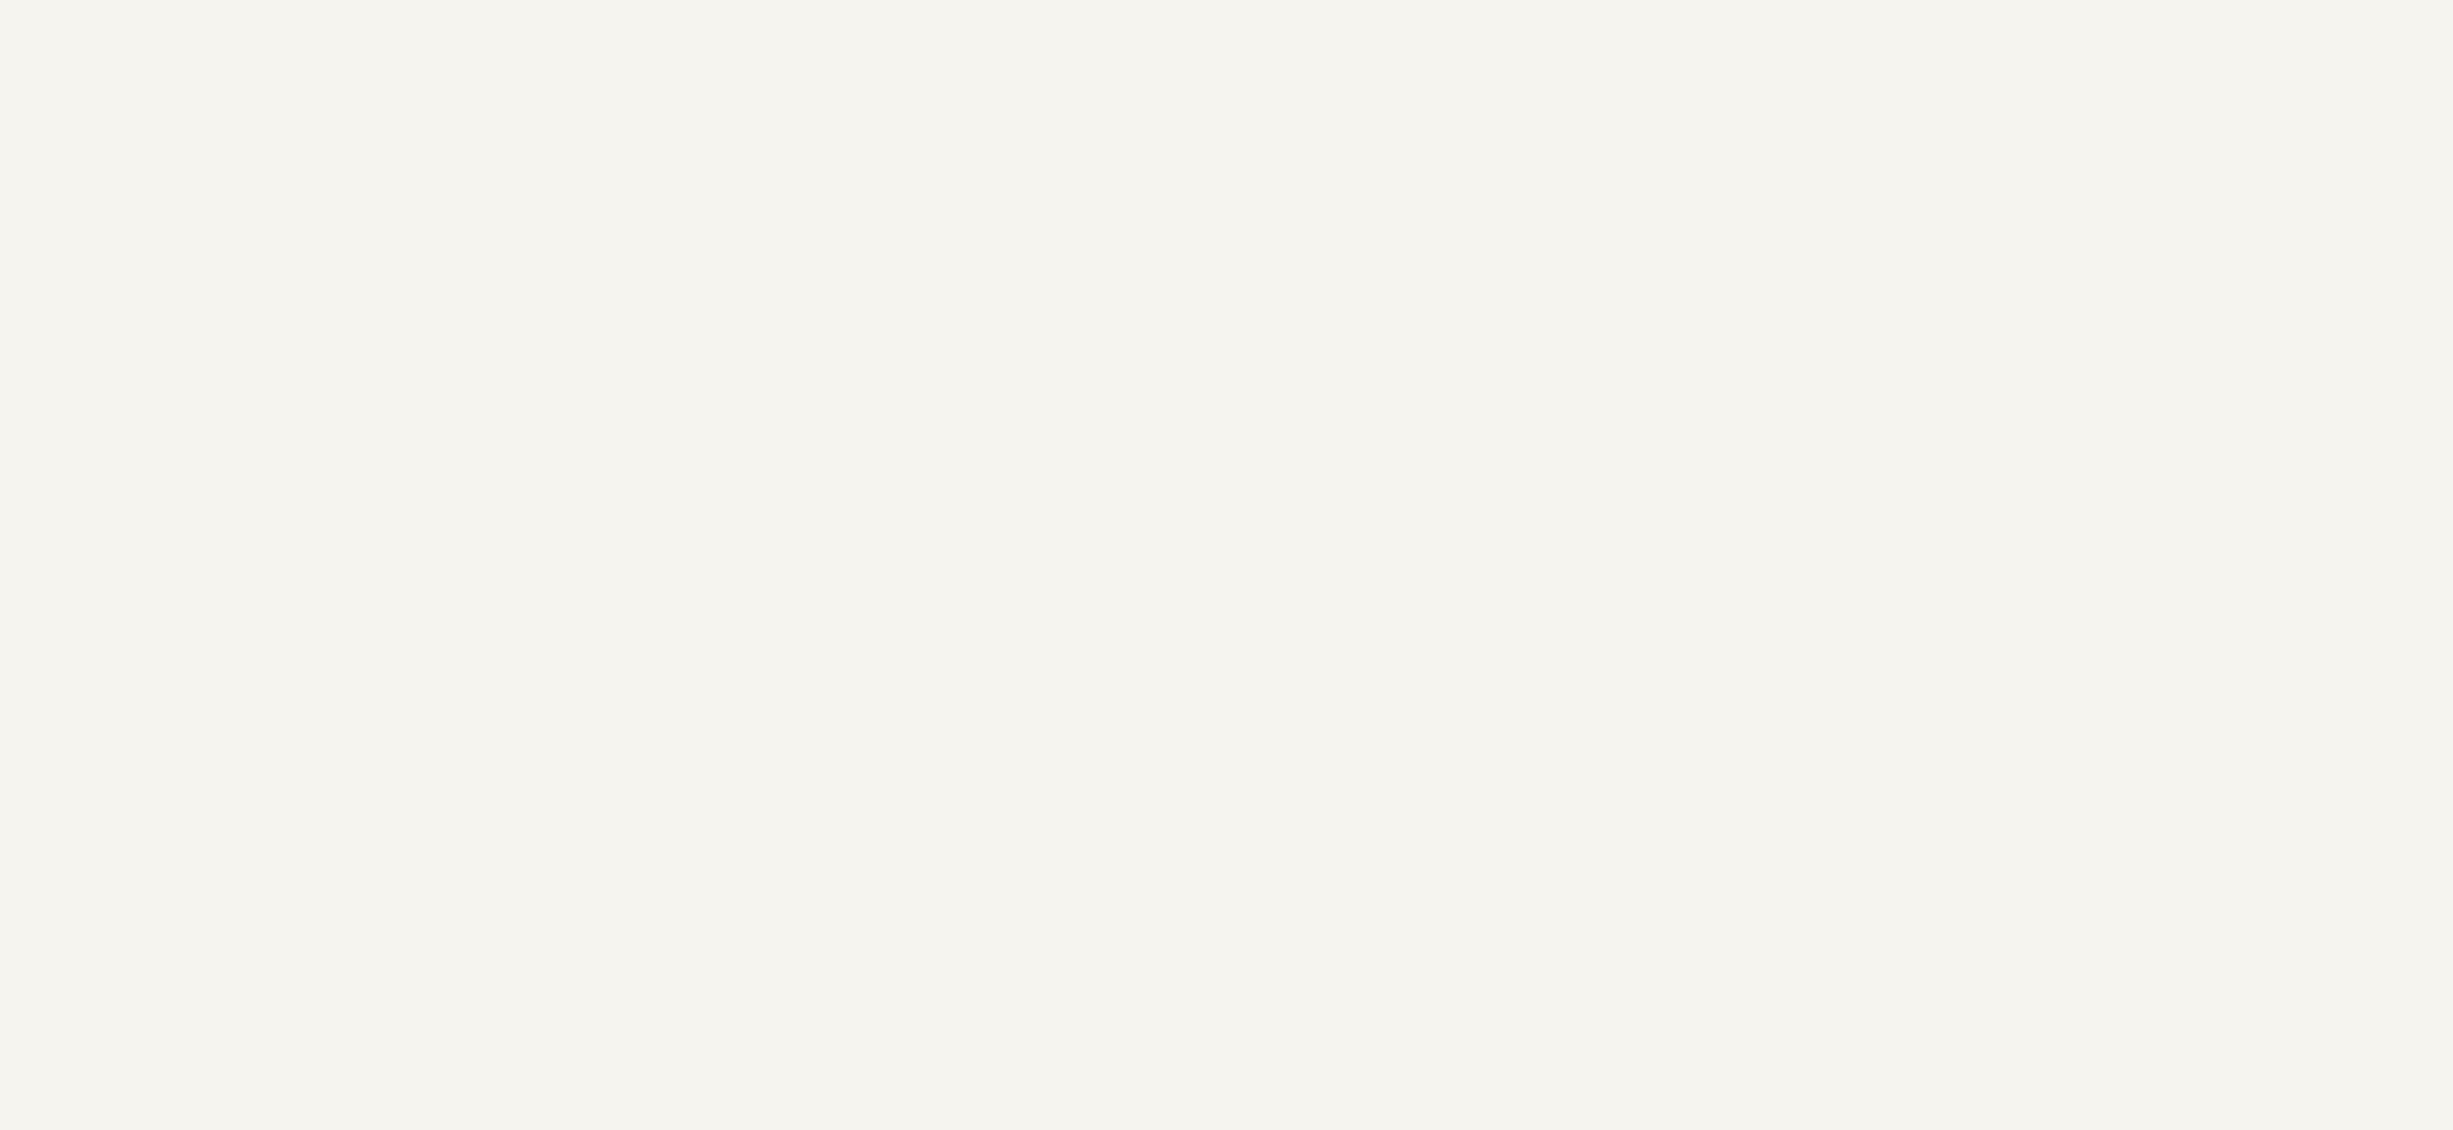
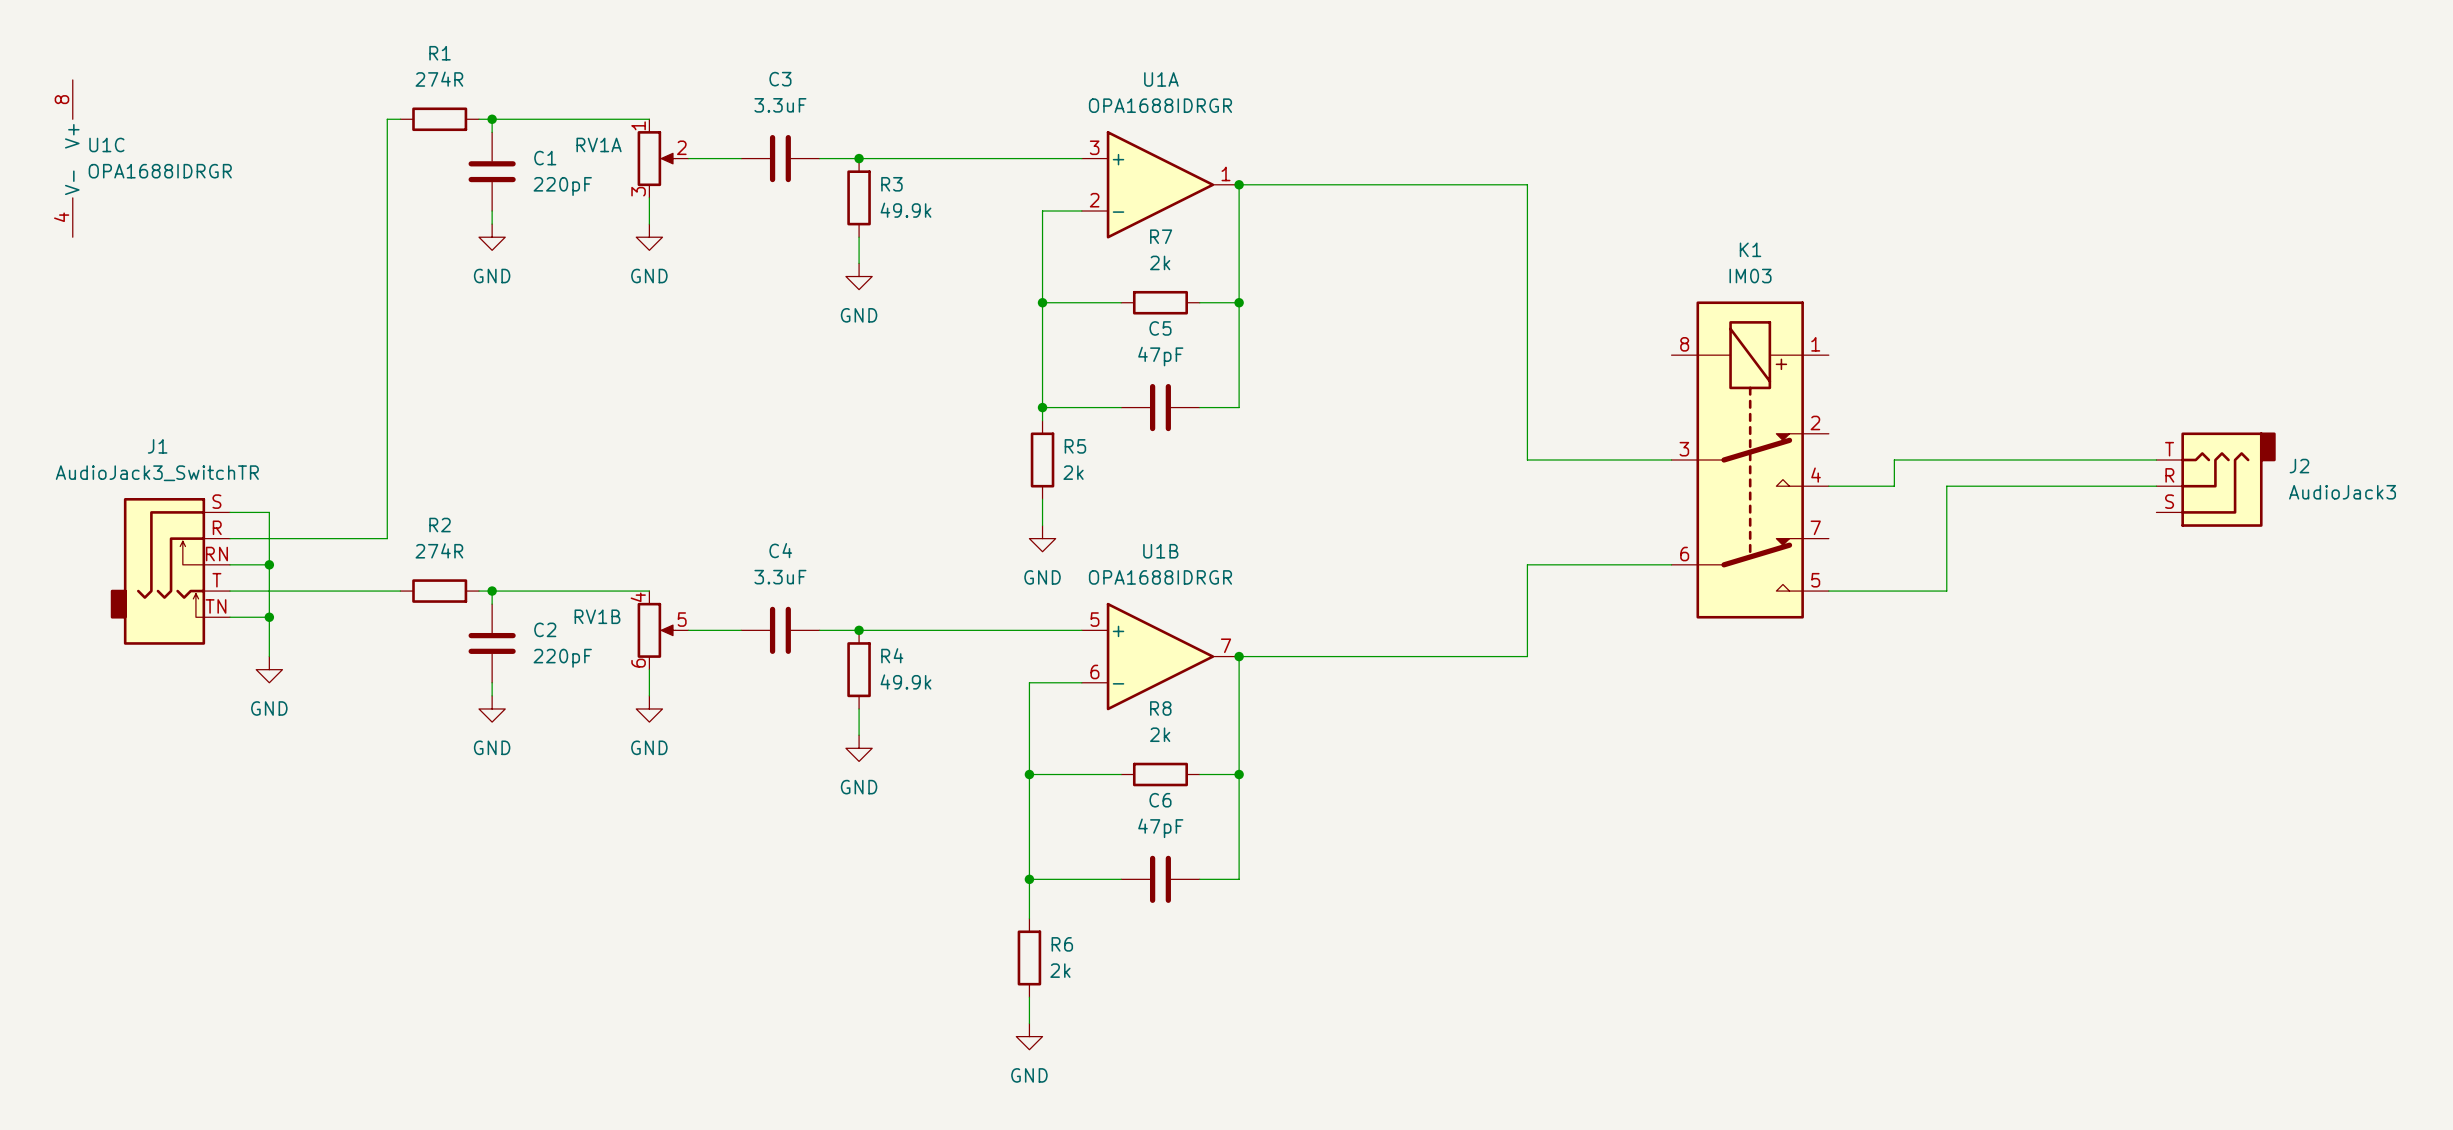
wire: none -> (400, 119) (387, 119) (387, 538) (230, 538)
R1: none -> 274R (439, 119)
wire: none -> (479, 119) (649, 119)
wire: none -> (492, 119) (492, 132)
junction: none -> (492, 119)
U1C: none -> OPA1688IDRGR (72, 158)
RV1A: none -> (663, 158)
wire: none -> (688, 158) (741, 158)
C3: none -> 3.3uF (780, 158)
wire: none -> (819, 158) (1081, 158)
junction: none -> (859, 158)
C1: none -> 220pF (492, 171)
U1A: none -> OPA1688IDRGR (1160, 184)
junction: none -> (1239, 184)
wire: none -> (649, 197) (649, 224)
R3: none -> 49.9k (859, 197)
wire: none -> (492, 211) (492, 224)
wire: none -> (1081, 211) (1042, 211) (1042, 420)
power symbol: none -> GND (492, 237)
power symbol: none -> GND (649, 237)
wire: none -> (859, 237) (859, 263)
power symbol: none -> GND (859, 276)
wire: none -> (1042, 302) (1121, 302)
junction: none -> (1042, 302)
R7: none -> 2k (1160, 302)
wire: none -> (1199, 302) (1239, 302)
junction: none -> (1239, 302)
wire: none -> (1042, 407) (1121, 407)
junction: none -> (1042, 407)
C5: none -> 47pF (1160, 407)
wire: none -> (1199, 407) (1239, 407) (1239, 184) (1527, 184) (1527, 459) (1671, 459)
R5: none -> 2k (1042, 459)
K1: none -> IM03 (1750, 459)
wire: none -> (2156, 459) (1894, 459) (1894, 486) (1828, 486)
J2: none -> AudioJack3 (2216, 479)
wire: none -> (2156, 486) (1946, 486) (1946, 591) (1828, 591)
wire: none -> (1042, 499) (1042, 525)
wire: none -> (230, 512) (269, 512) (269, 656)
power symbol: none -> GND (1042, 538)
wire: none -> (230, 564) (269, 564)
junction: none -> (269, 564)
wire: none -> (1671, 564) (1527, 564) (1527, 656) (1239, 656) (1239, 879) (1199, 879)
J1: none -> AudioJack3_SwitchTR (170, 571)
wire: none -> (230, 591) (400, 591)
R2: none -> 274R (439, 591)
wire: none -> (479, 591) (649, 591)
wire: none -> (492, 591) (492, 604)
junction: none -> (492, 591)
wire: none -> (230, 617) (269, 617)
junction: none -> (269, 617)
RV1B: none -> (663, 630)
wire: none -> (688, 630) (741, 630)
C4: none -> 3.3uF (780, 630)
wire: none -> (819, 630) (1081, 630)
junction: none -> (859, 630)
C2: none -> 220pF (492, 643)
U1B: none -> OPA1688IDRGR (1160, 656)
junction: none -> (1239, 656)
power symbol: none -> GND (269, 669)
wire: none -> (649, 669) (649, 695)
R4: none -> 49.9k (859, 669)
wire: none -> (492, 682) (492, 695)
wire: none -> (1081, 682) (1029, 682) (1029, 918)
power symbol: none -> GND (492, 708)
power symbol: none -> GND (649, 708)
wire: none -> (859, 708) (859, 735)
power symbol: none -> GND (859, 748)
wire: none -> (1029, 774) (1121, 774)
junction: none -> (1029, 774)
R8: none -> 2k (1160, 774)
wire: none -> (1199, 774) (1239, 774)
junction: none -> (1239, 774)
wire: none -> (1029, 879) (1121, 879)
junction: none -> (1029, 879)
C6: none -> 47pF (1160, 879)
R6: none -> 2k (1029, 957)
wire: none -> (1029, 997) (1029, 1023)
power symbol: none -> GND (1029, 1036)

